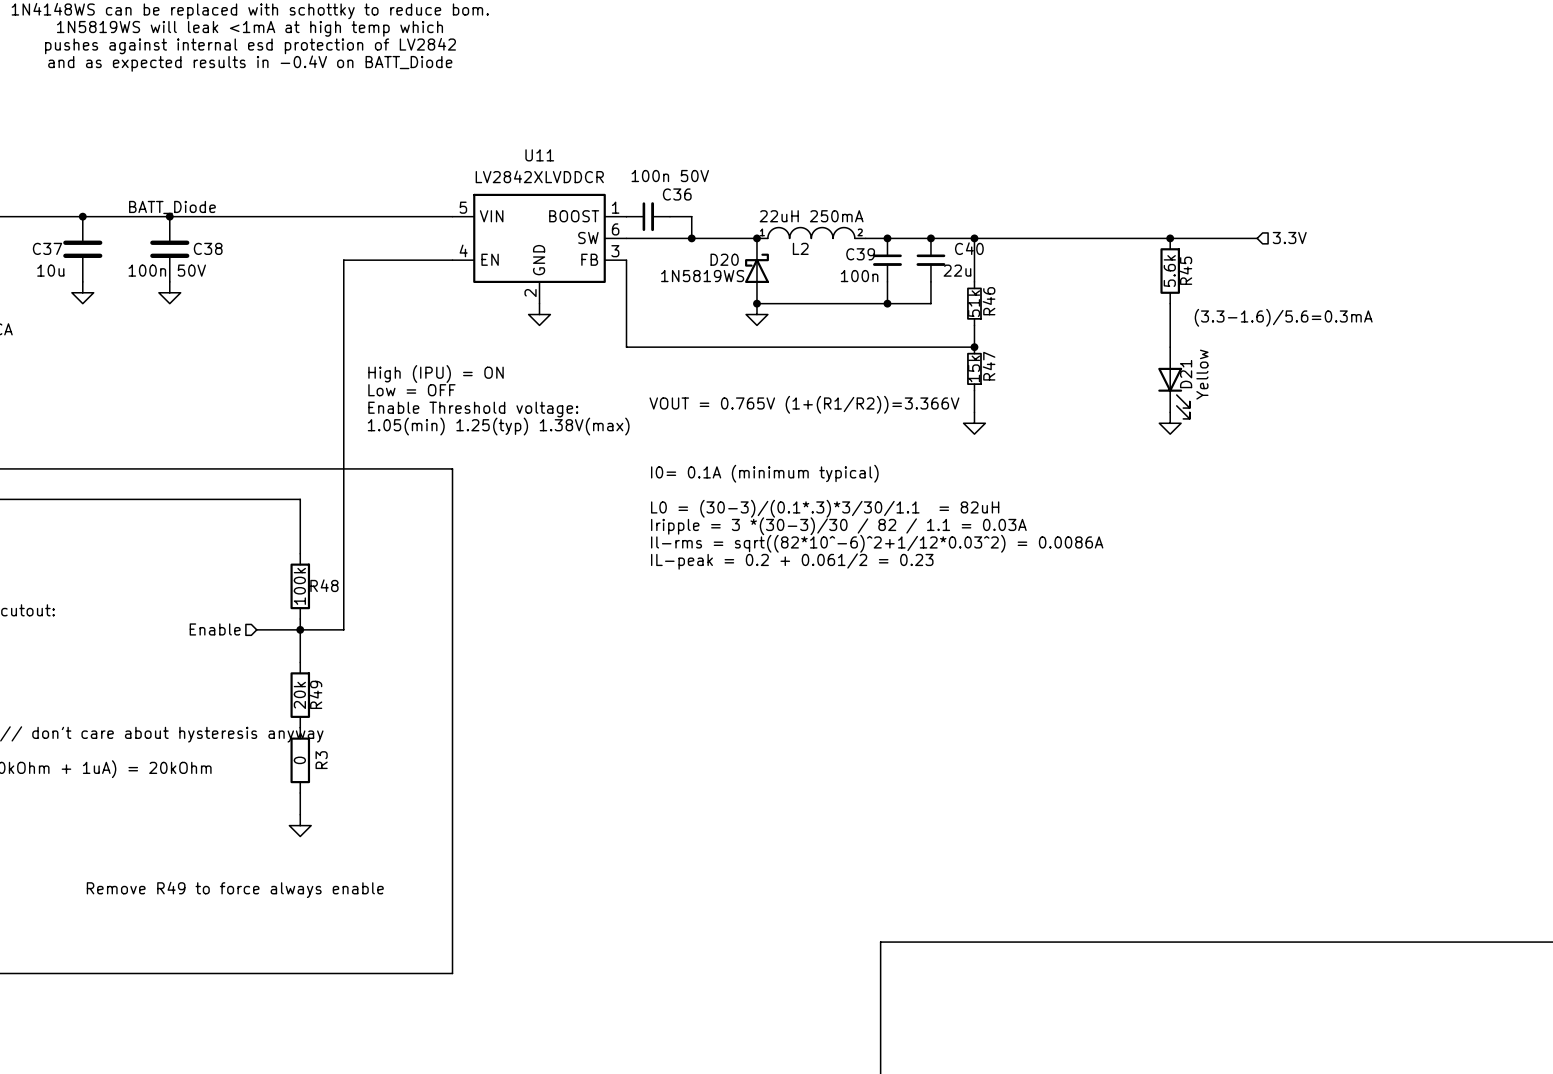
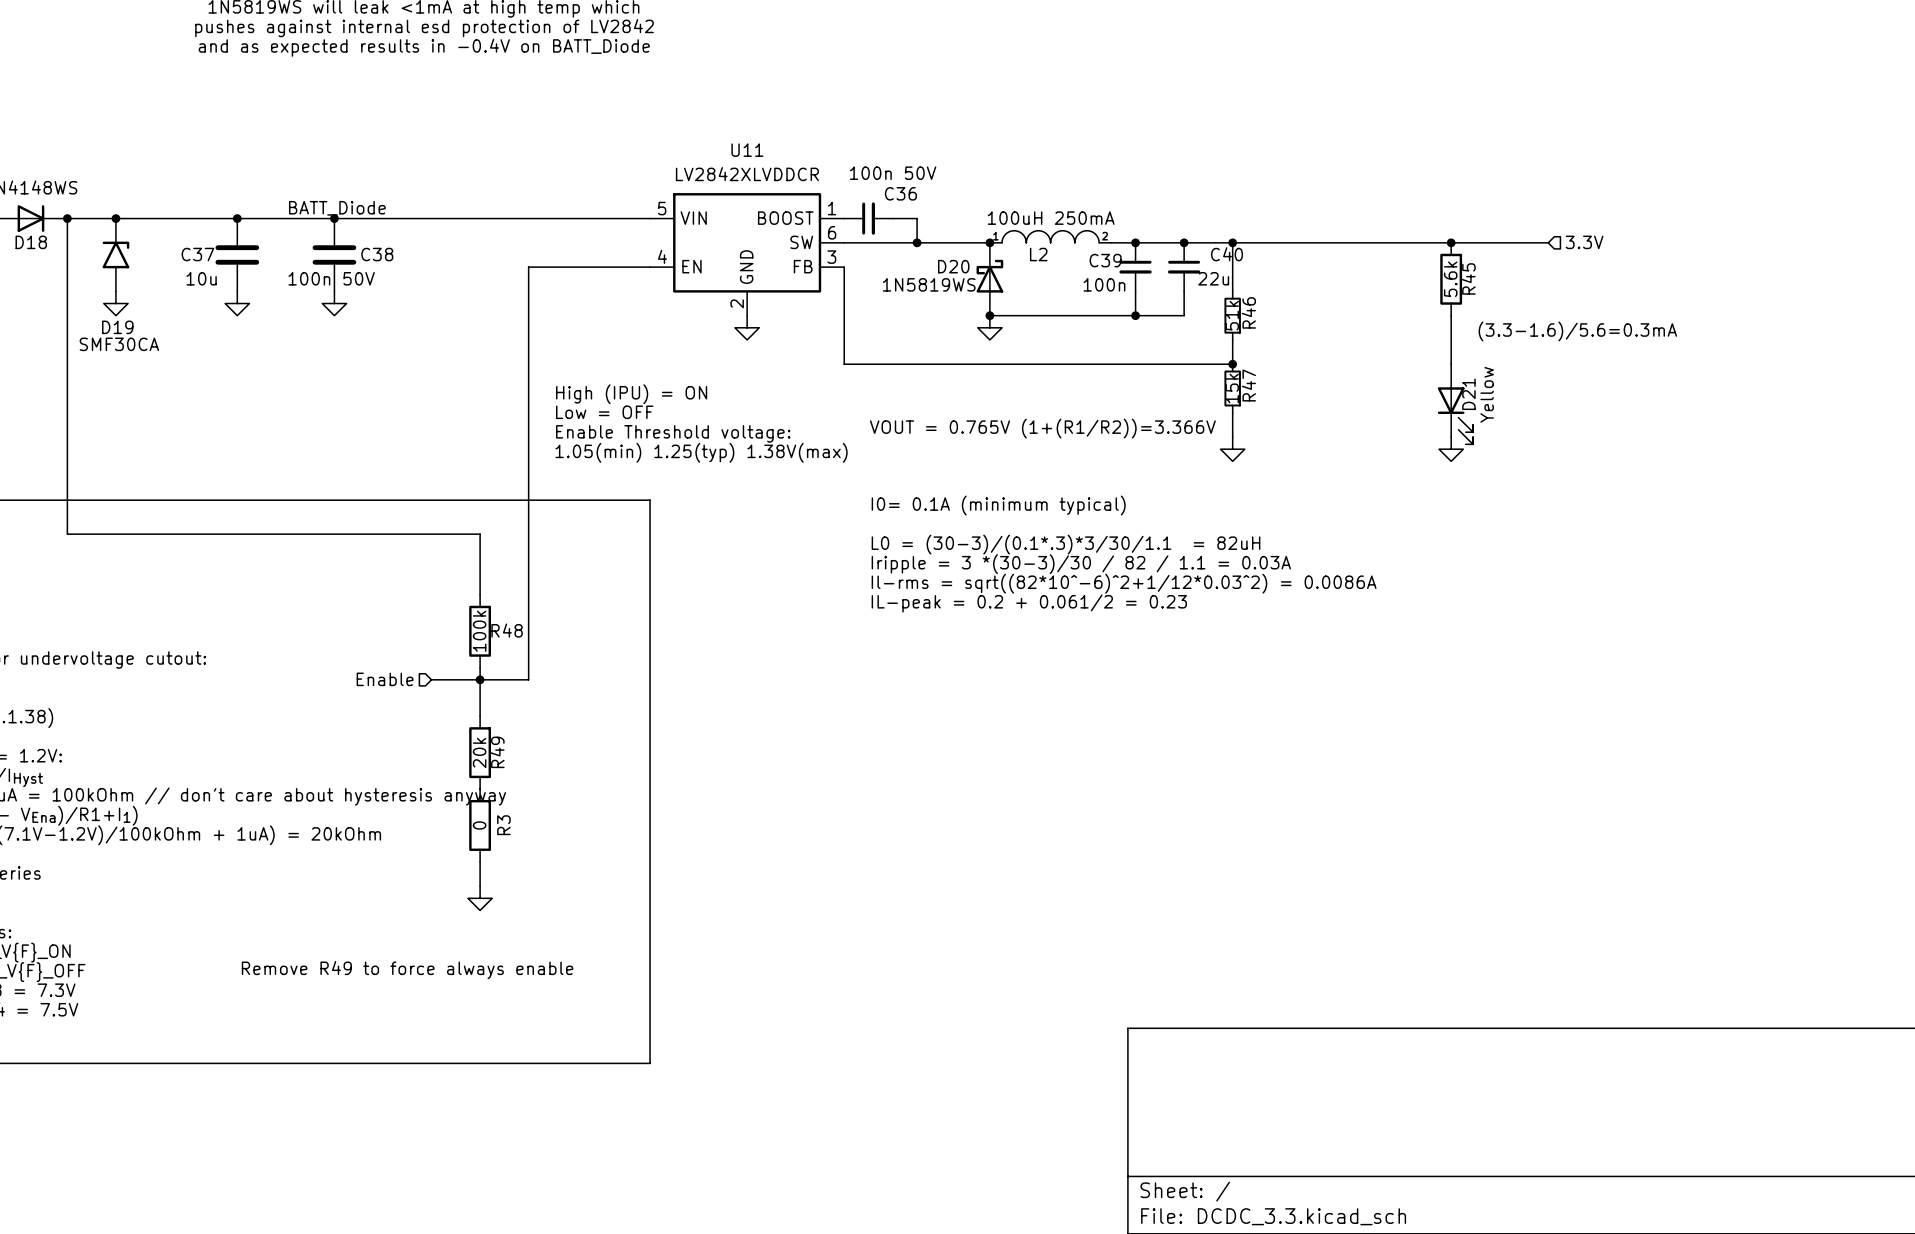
L2 value: 22uH 250mA (811, 216) -> 100uH 250mA (1051, 218)

